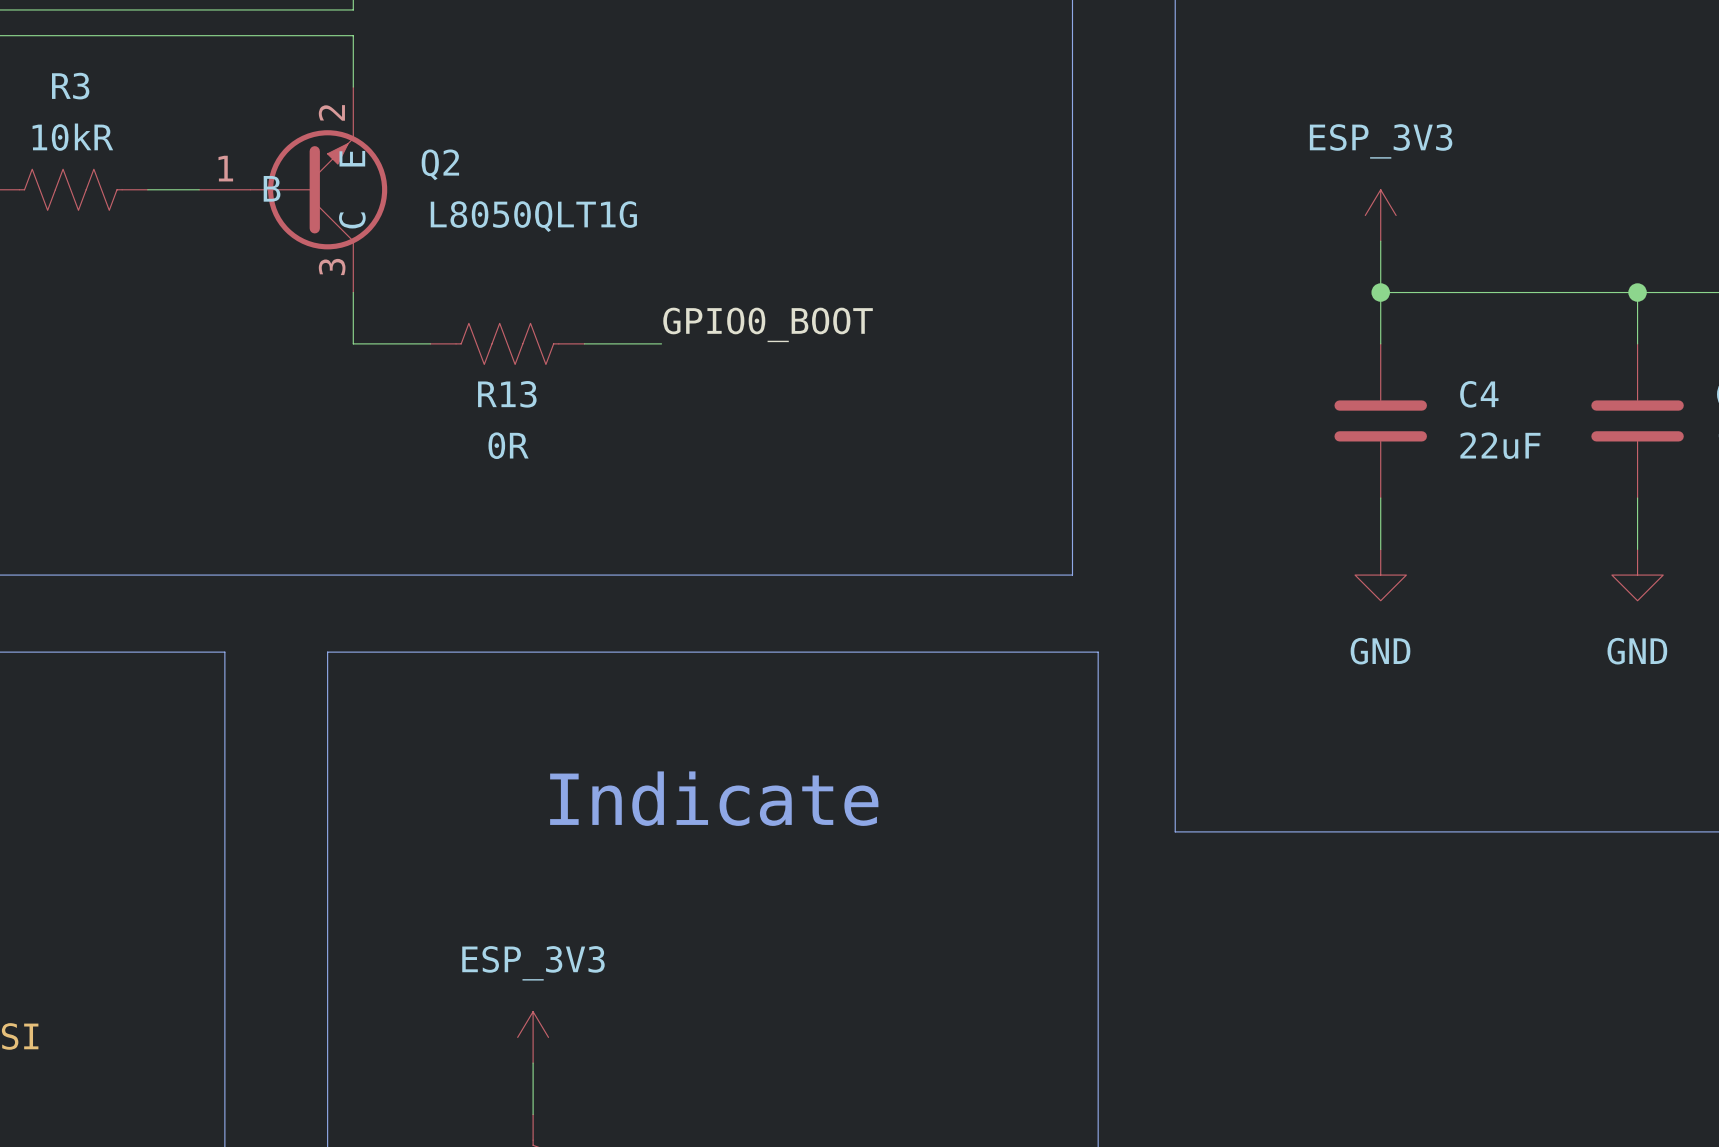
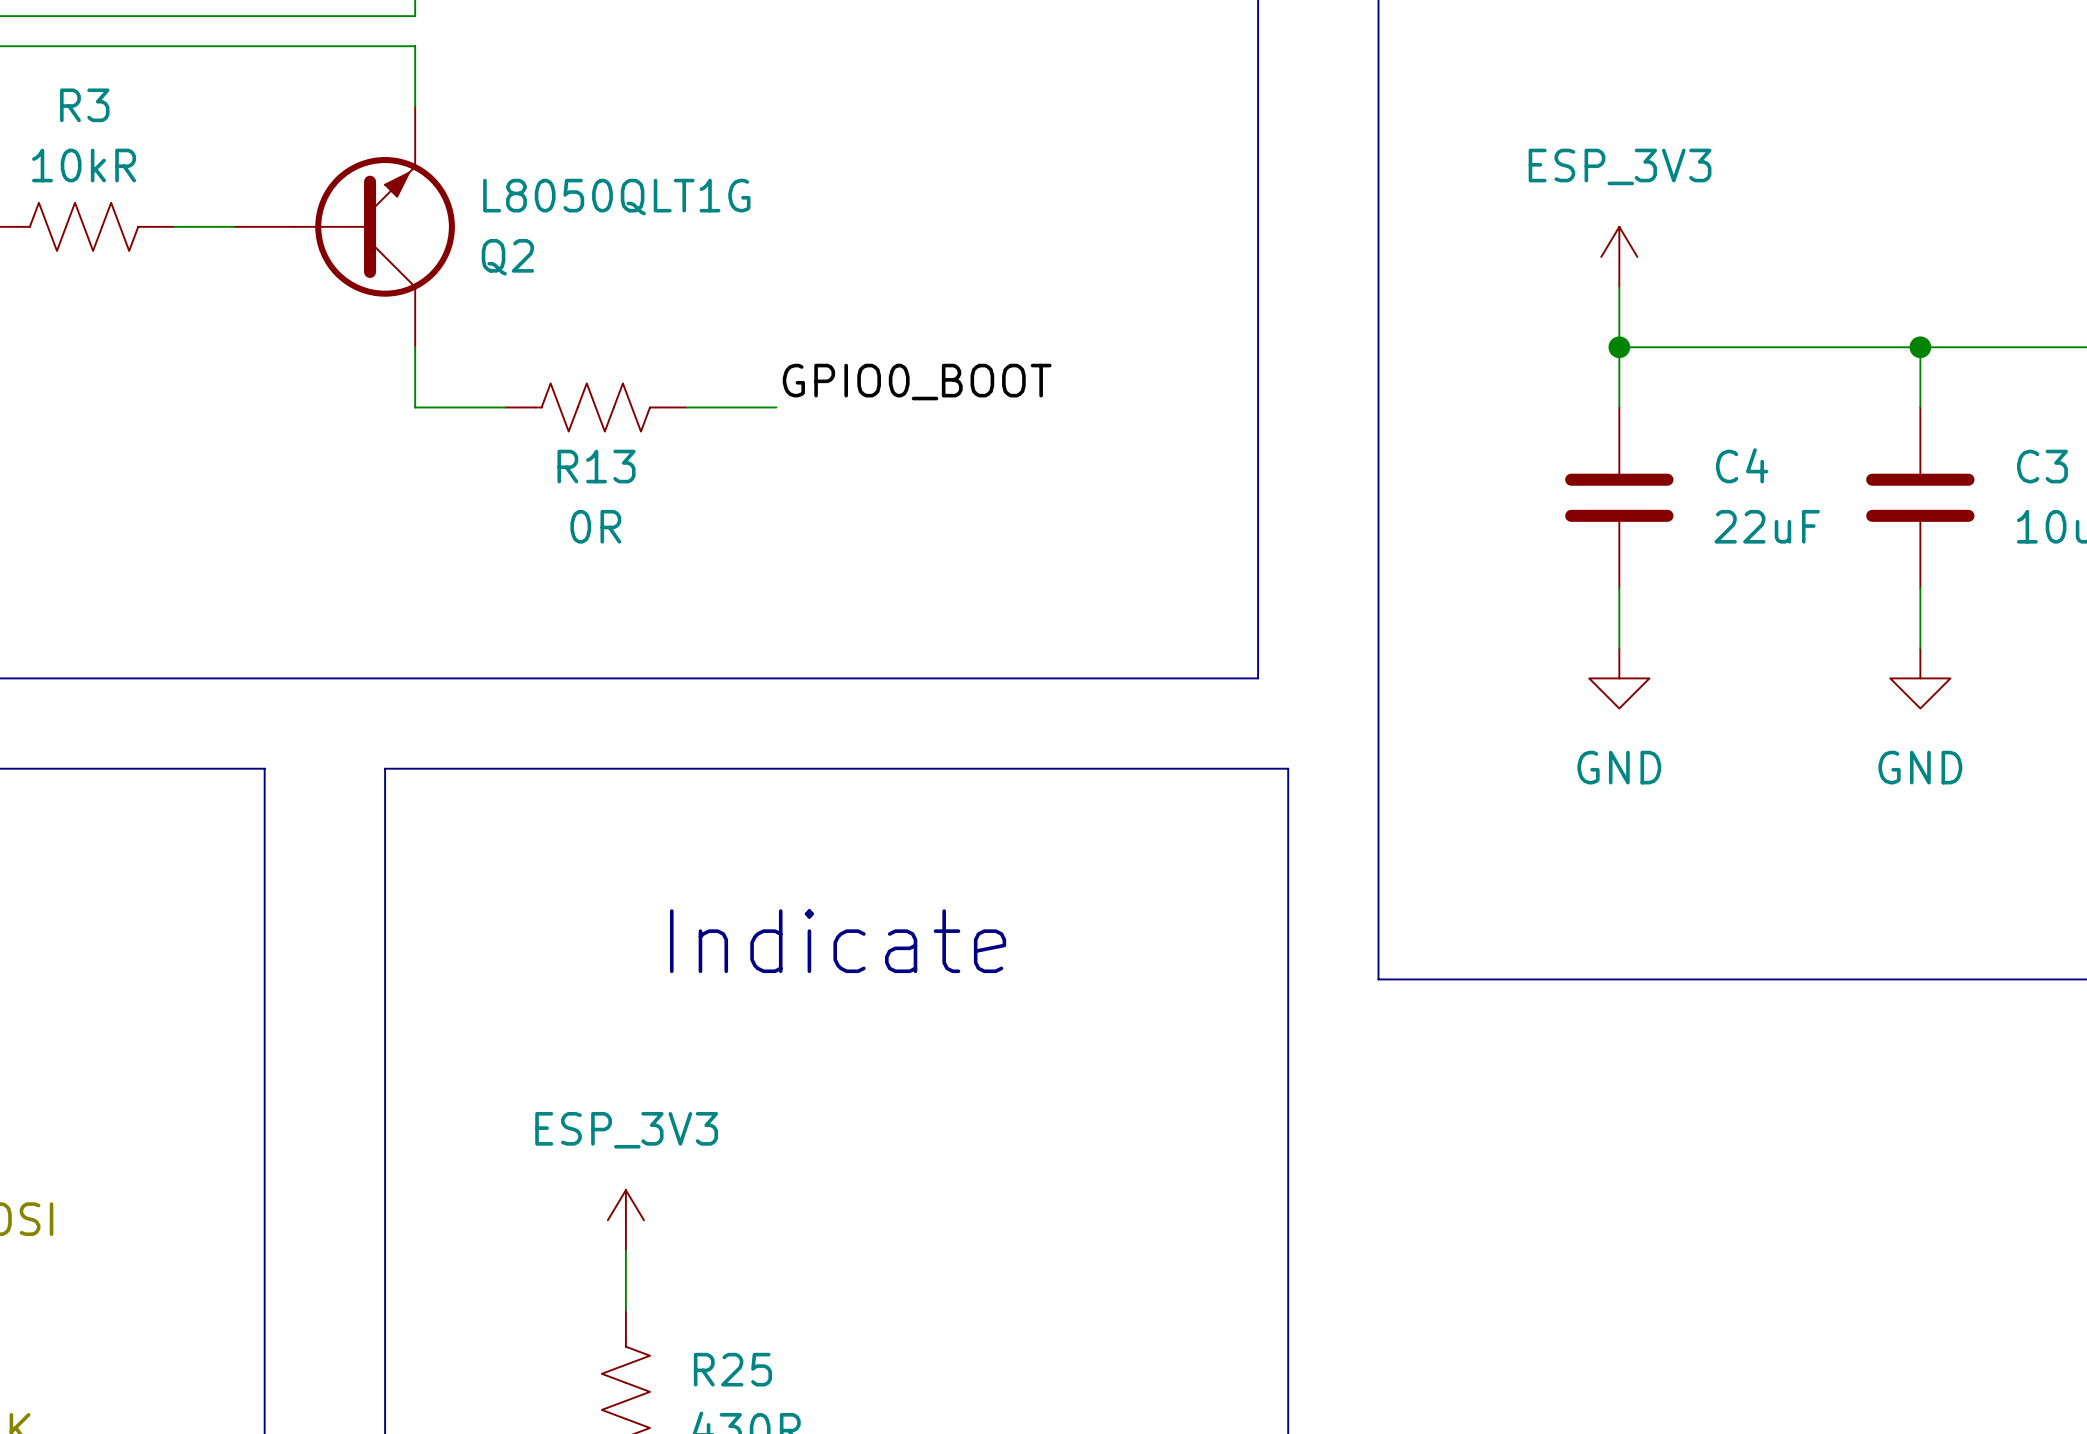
Q2 pin number: 2 (331, 112) -> none
Q2 pin name: E (352, 158) -> none
Q2 name position: Q2 (440, 164) -> Q2 (507, 257)
Q2 pin number: 1 (225, 168) -> none
Q2 pin name: B (272, 188) -> none
Q2 value position: L8050QLT1G (533, 216) -> L8050QLT1G (616, 197)
Q2 pin name: C (352, 220) -> none
Q2 pin number: 3 (332, 266) -> none

